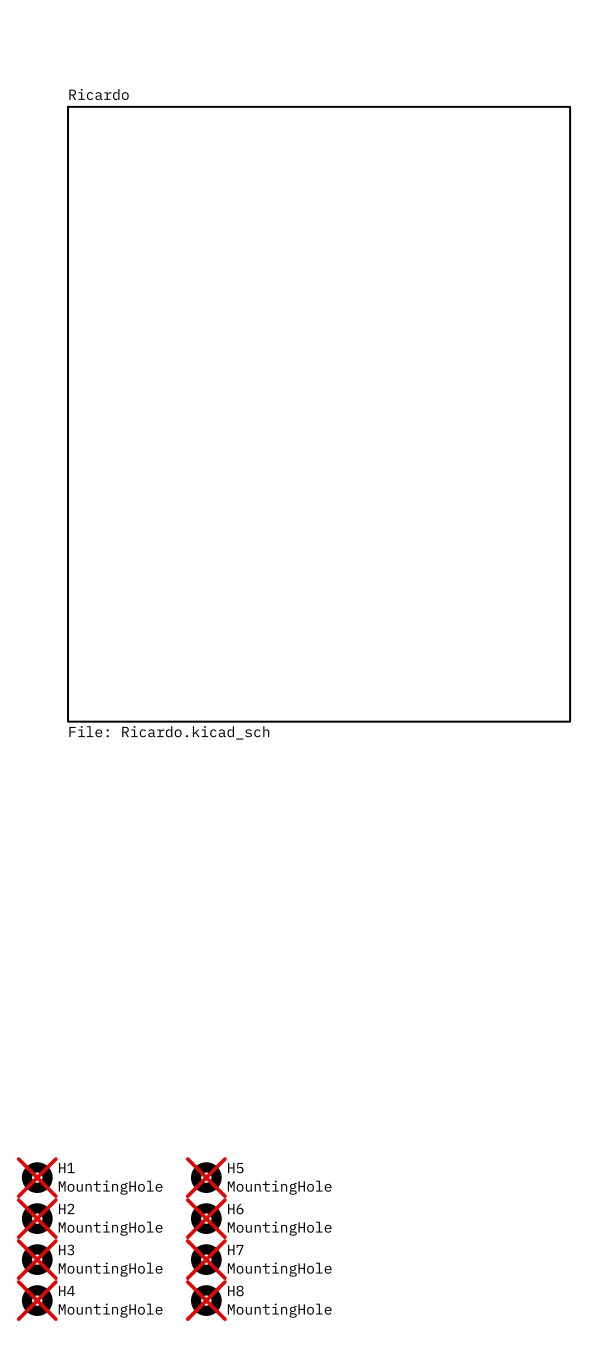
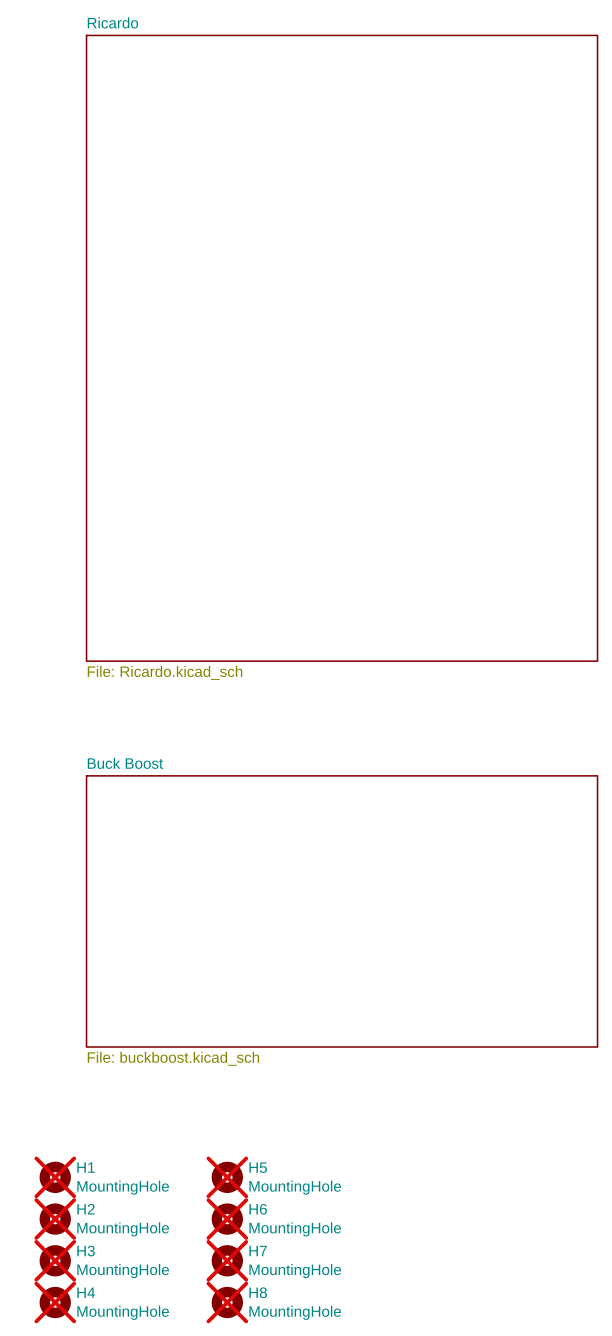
sheet Ricardo position: (319, 414) -> (342, 348)
sheet Buck Boost: none -> File: buckboost.kicad_sch (342, 911)

